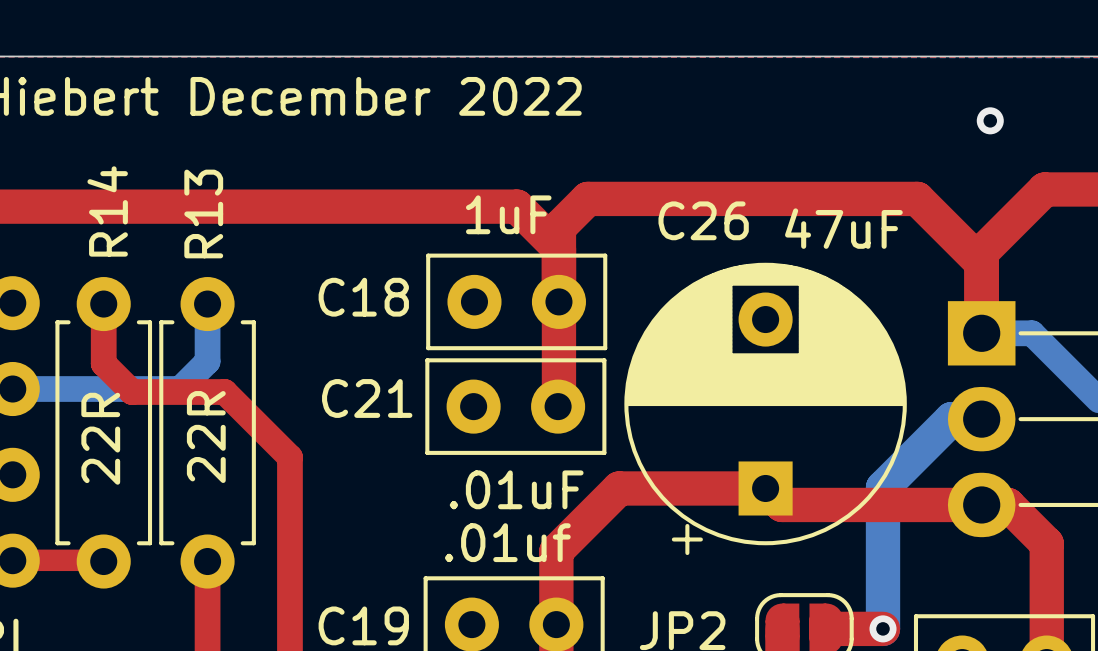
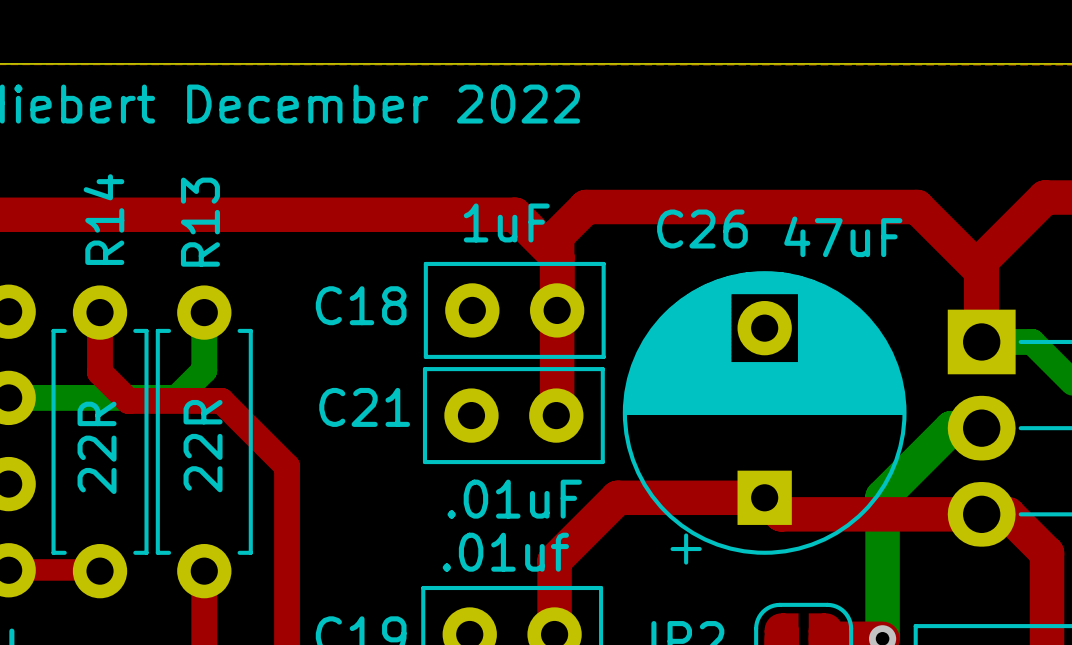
via: (990, 120) -> none

